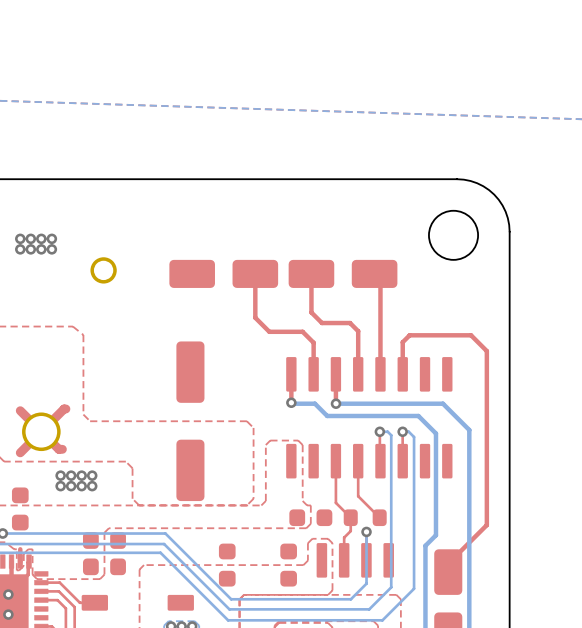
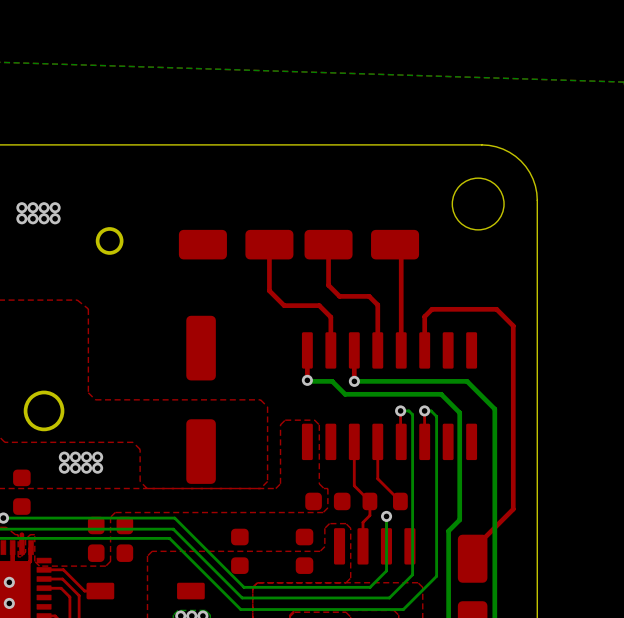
top track: (65, 408) (20, 452) -> none
top track: (20, 410) (58, 449) (62, 449) -> none

